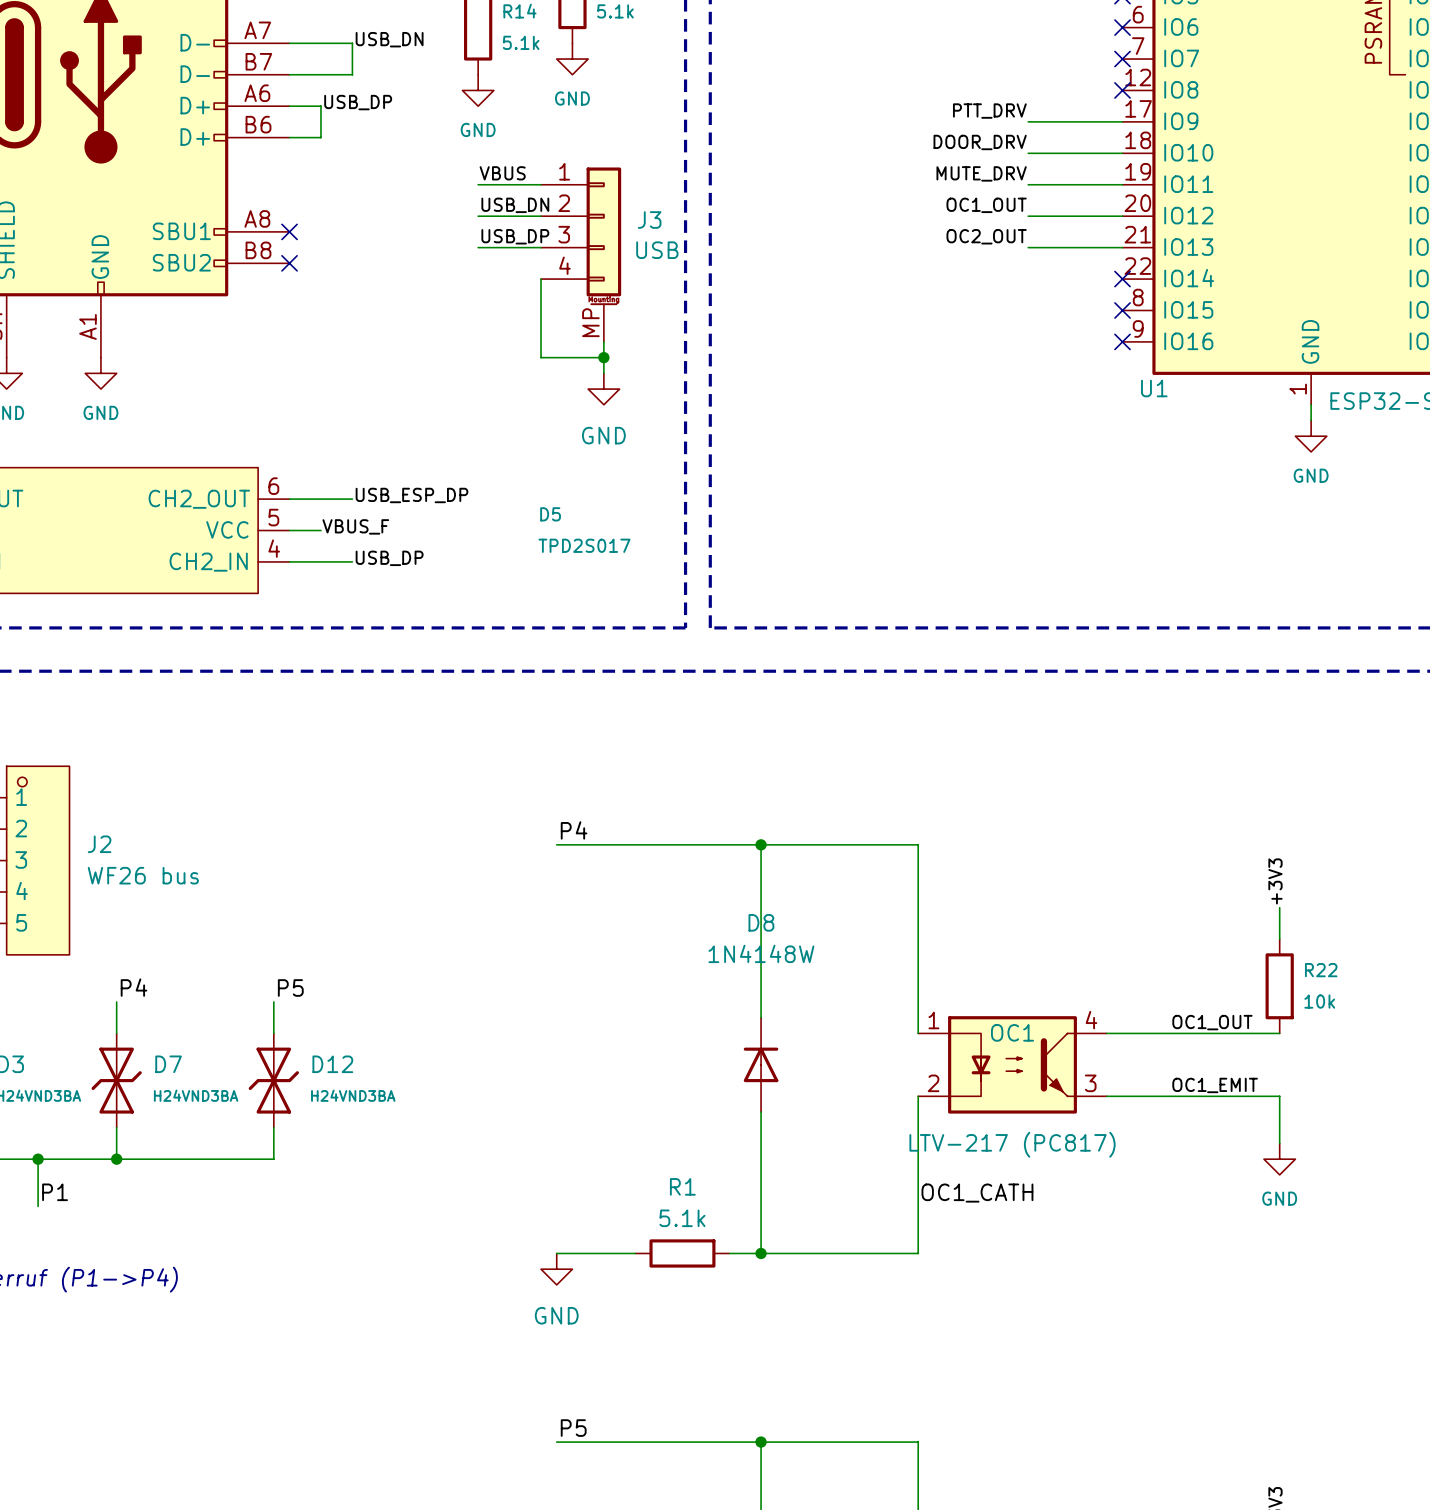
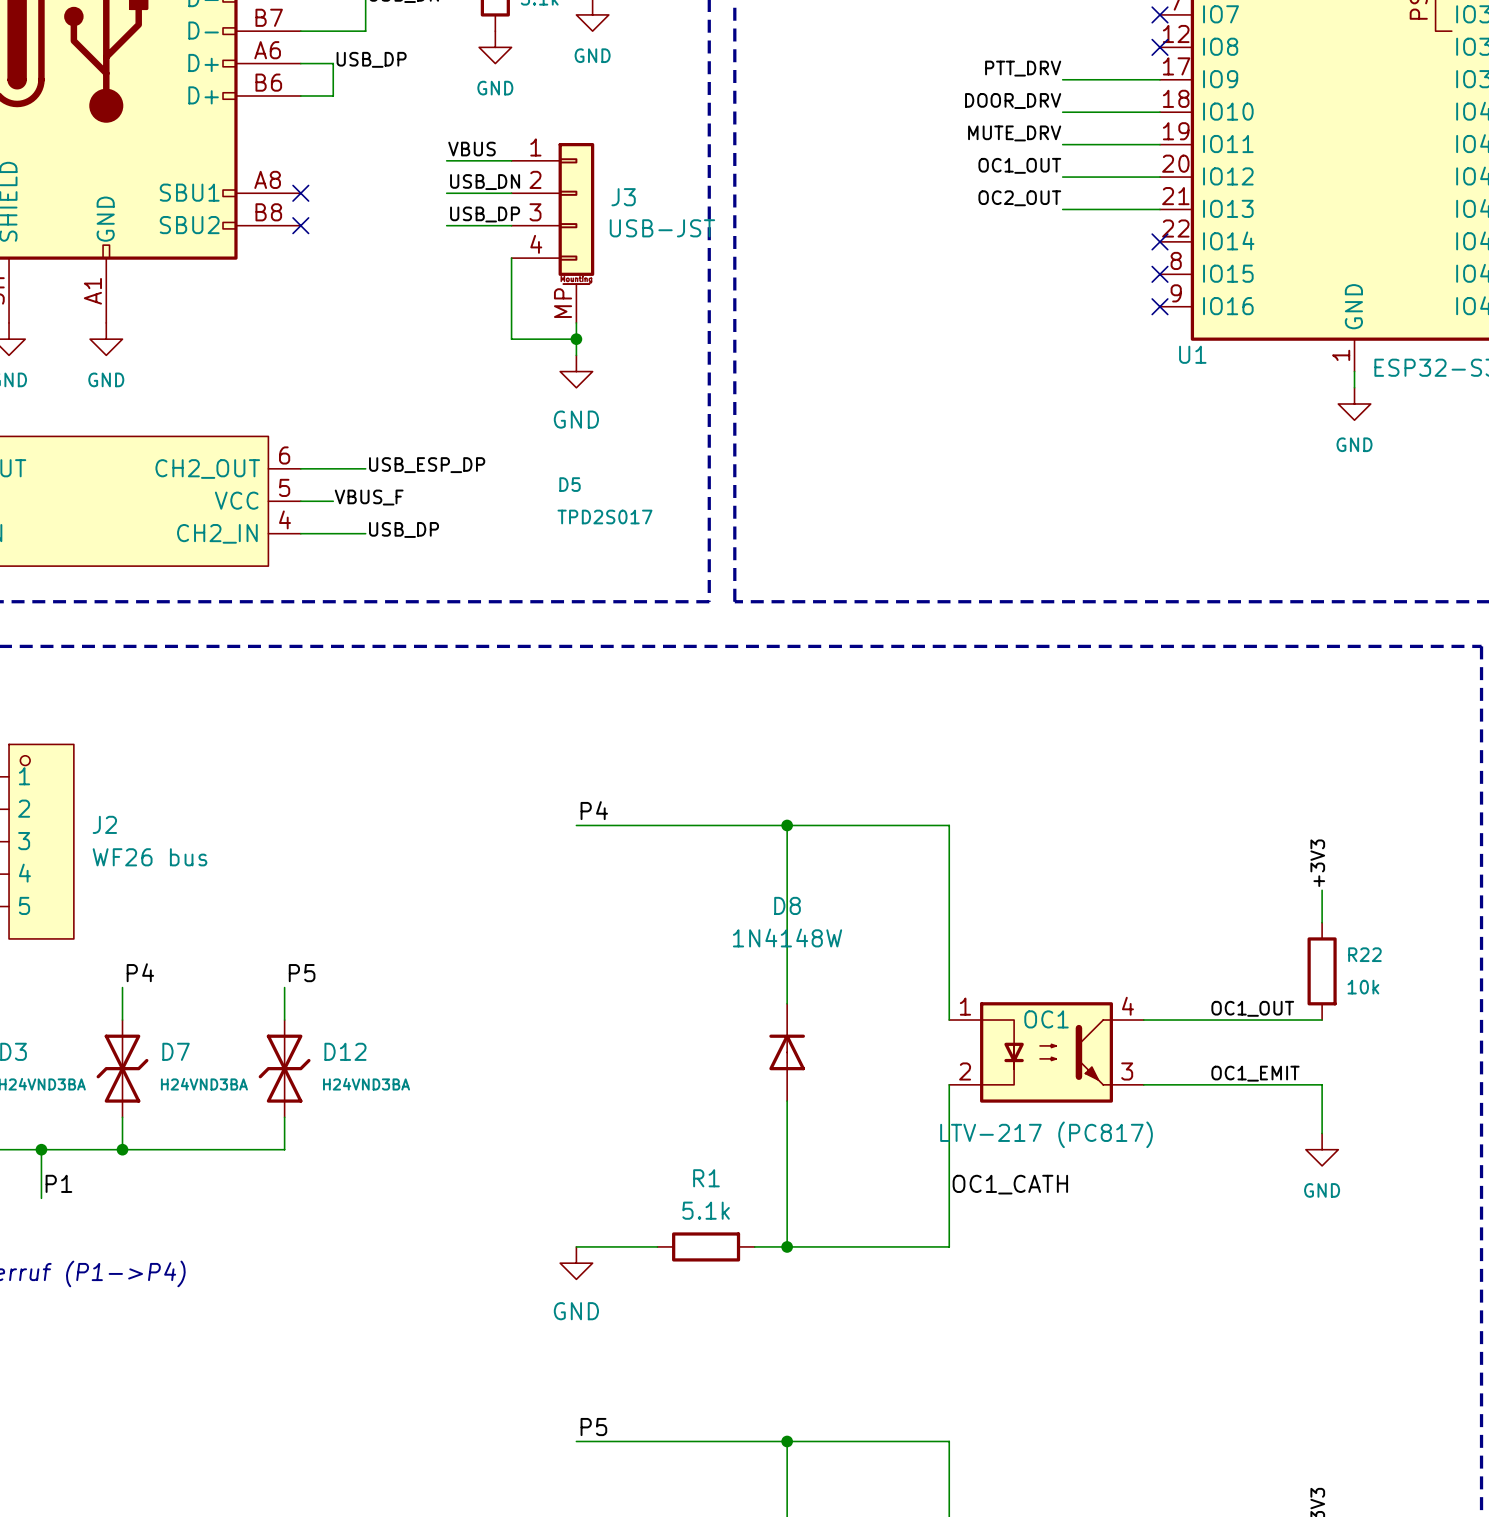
label position: VBUS (502, 173) -> VBUS (472, 149)
wire: (478, 184) (541, 184) -> (446, 225) (511, 225)
label position: USB_DN (515, 205) -> USB_DN (485, 182)
wire: (478, 216) (541, 216) -> (446, 160) (511, 160)
label position: USB_DP (515, 236) -> USB_DP (485, 214)
wire: (478, 247) (541, 247) -> (446, 193) (511, 193)
J3 value: USB (657, 250) -> USB-JST (662, 228)
J3 position: (581, 254) -> (552, 232)
wire: (541, 279) (541, 357) (603, 357) -> (511, 258) (511, 339) (576, 339)
wire: (603, 341) (603, 373) -> (576, 322) (576, 355)
junction position: (603, 357) -> (576, 339)
power symbol position: GND (603, 389) -> GND (576, 371)

